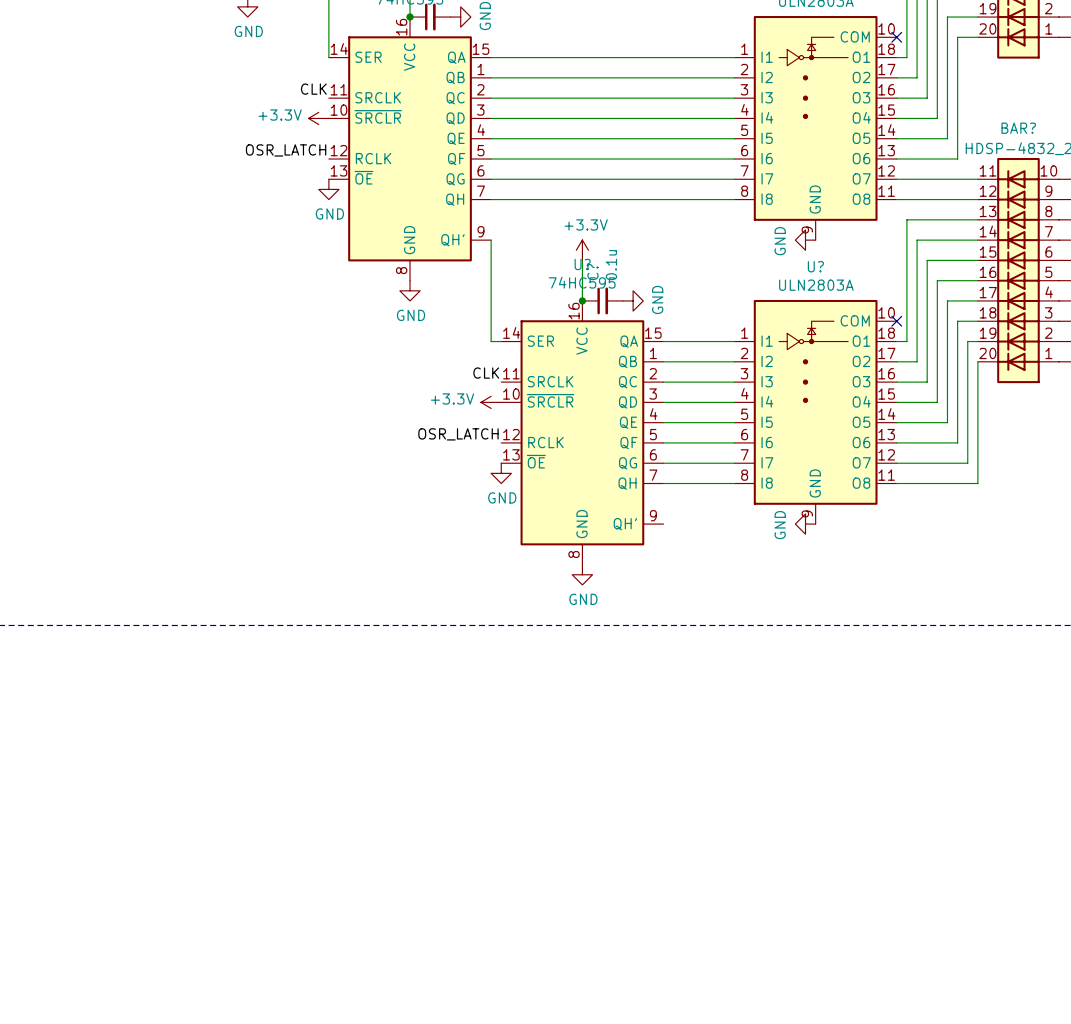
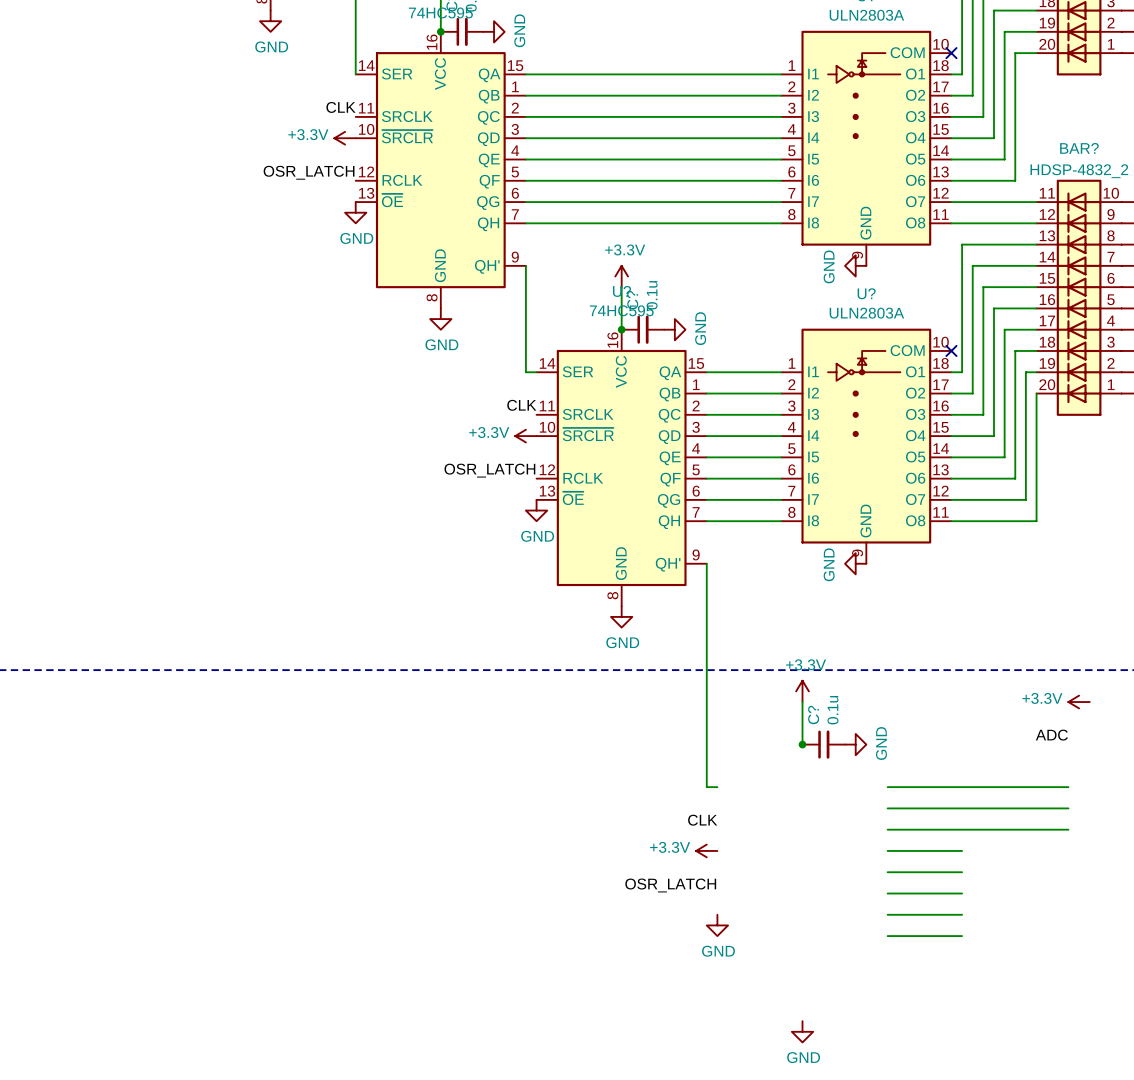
wire: none -> (706, 563) (706, 787) (717, 787)
power symbol: none -> +3.3V (802, 691)
wire: none -> (802, 702) (802, 744)
power symbol: none -> +3.3V (1079, 702)
label: none -> ADC (1051, 735)
junction: none -> (802, 744)
C?: none -> 0.1u (823, 744)
power symbol: none -> GND (855, 744)
wire: none -> (887, 787) (1068, 787)
wire: none -> (887, 808) (1068, 808)
label: none -> CLK (702, 820)
wire: none -> (887, 829) (1068, 829)
power symbol: none -> +3.3V (706, 850)
wire: none -> (887, 850) (962, 850)
wire: none -> (887, 872) (962, 872)
label: none -> OSR_LATCH (670, 885)
wire: none -> (887, 893) (962, 893)
wire: none -> (887, 914) (962, 914)
power symbol: none -> GND (717, 925)
wire: none -> (887, 936) (962, 936)
power symbol: none -> GND (802, 1031)

